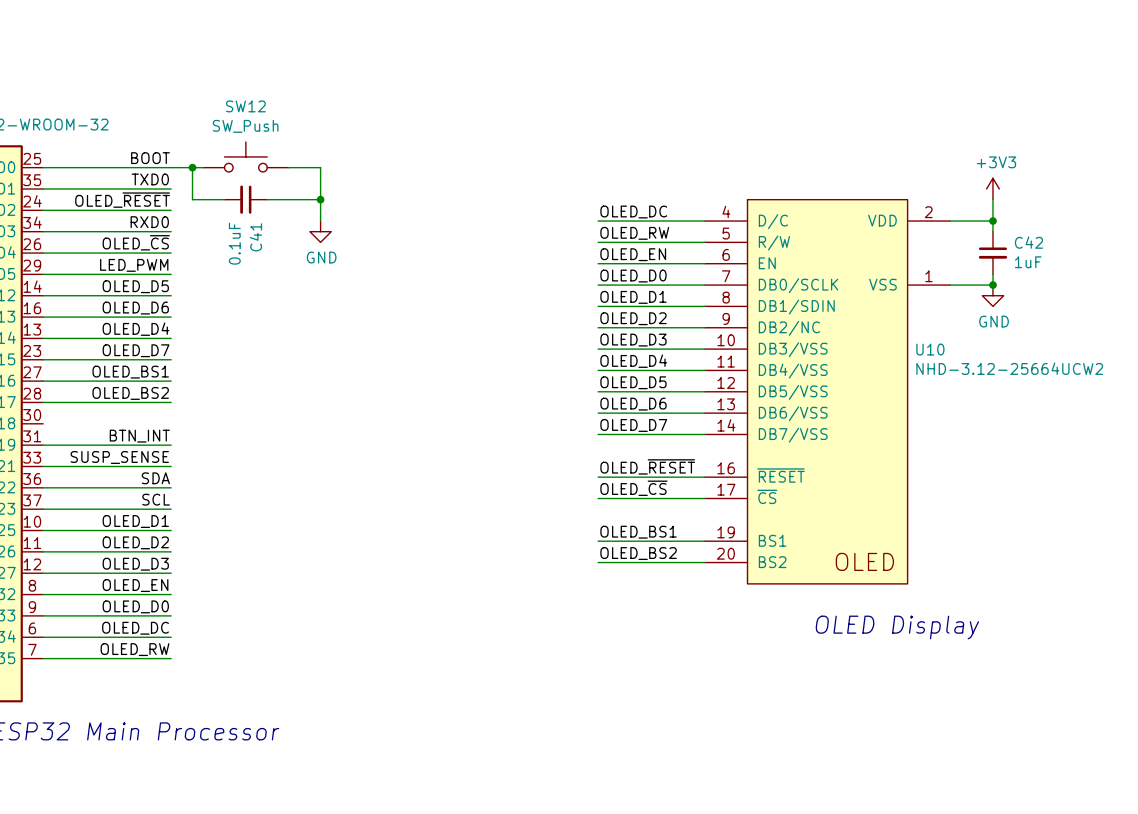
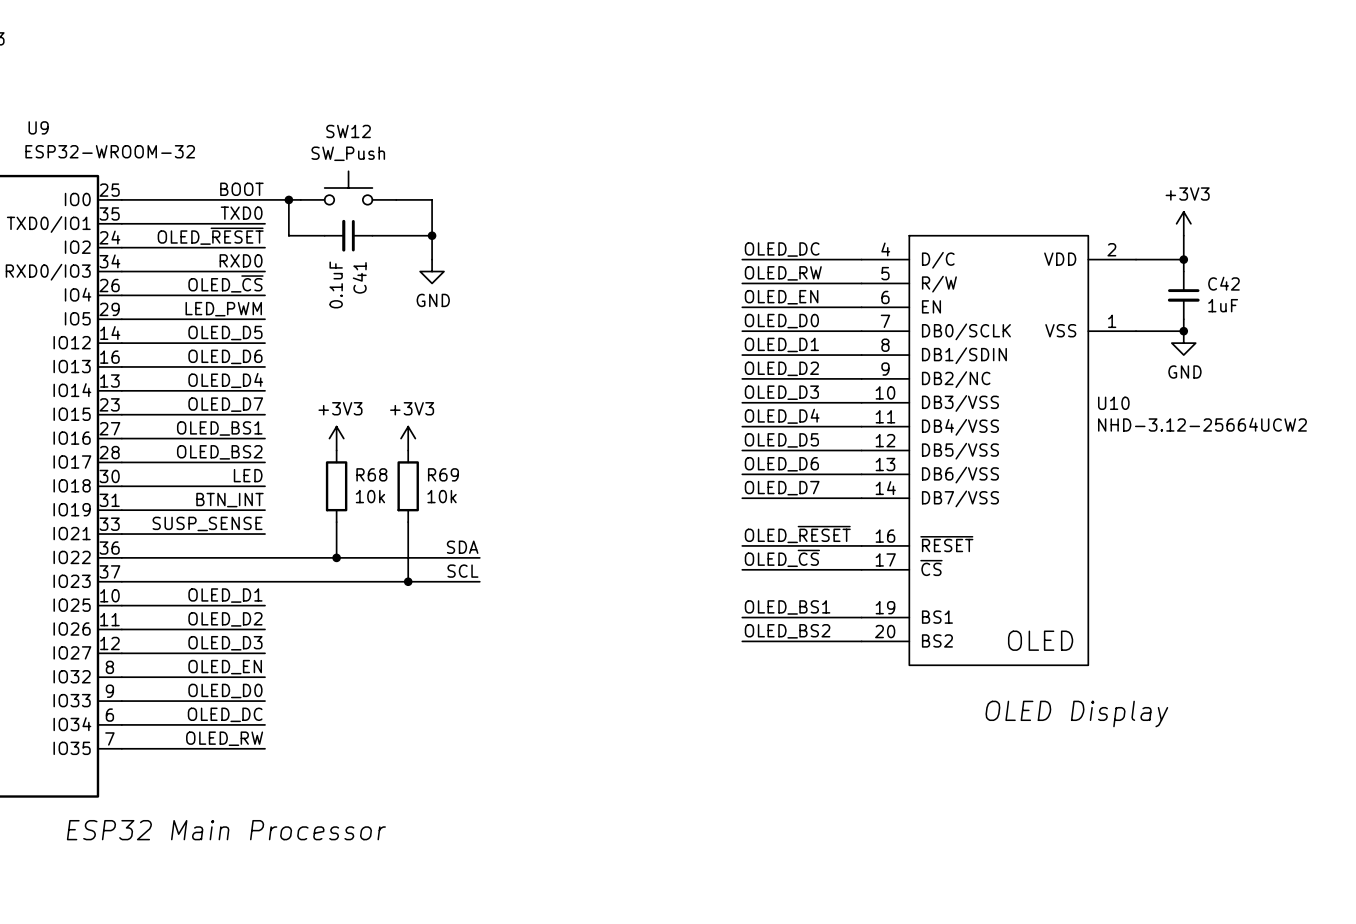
power symbol: none -> +3V3 (336, 438)
power symbol: none -> +3V3 (408, 438)
label: none -> LED (248, 475)
wire: none -> (121, 486) (265, 486)
R68: none -> 10k (336, 486)
R69: none -> 10k (408, 486)
wire: none -> (336, 522) (336, 557)
wire: none -> (408, 522) (408, 581)
label position: SDA (155, 478) -> SDA (462, 547)
wire: none -> (265, 557) (479, 557)
junction: none -> (336, 557)
label position: SCL (156, 499) -> SCL (462, 571)
wire: none -> (265, 581) (479, 581)
junction: none -> (408, 581)

